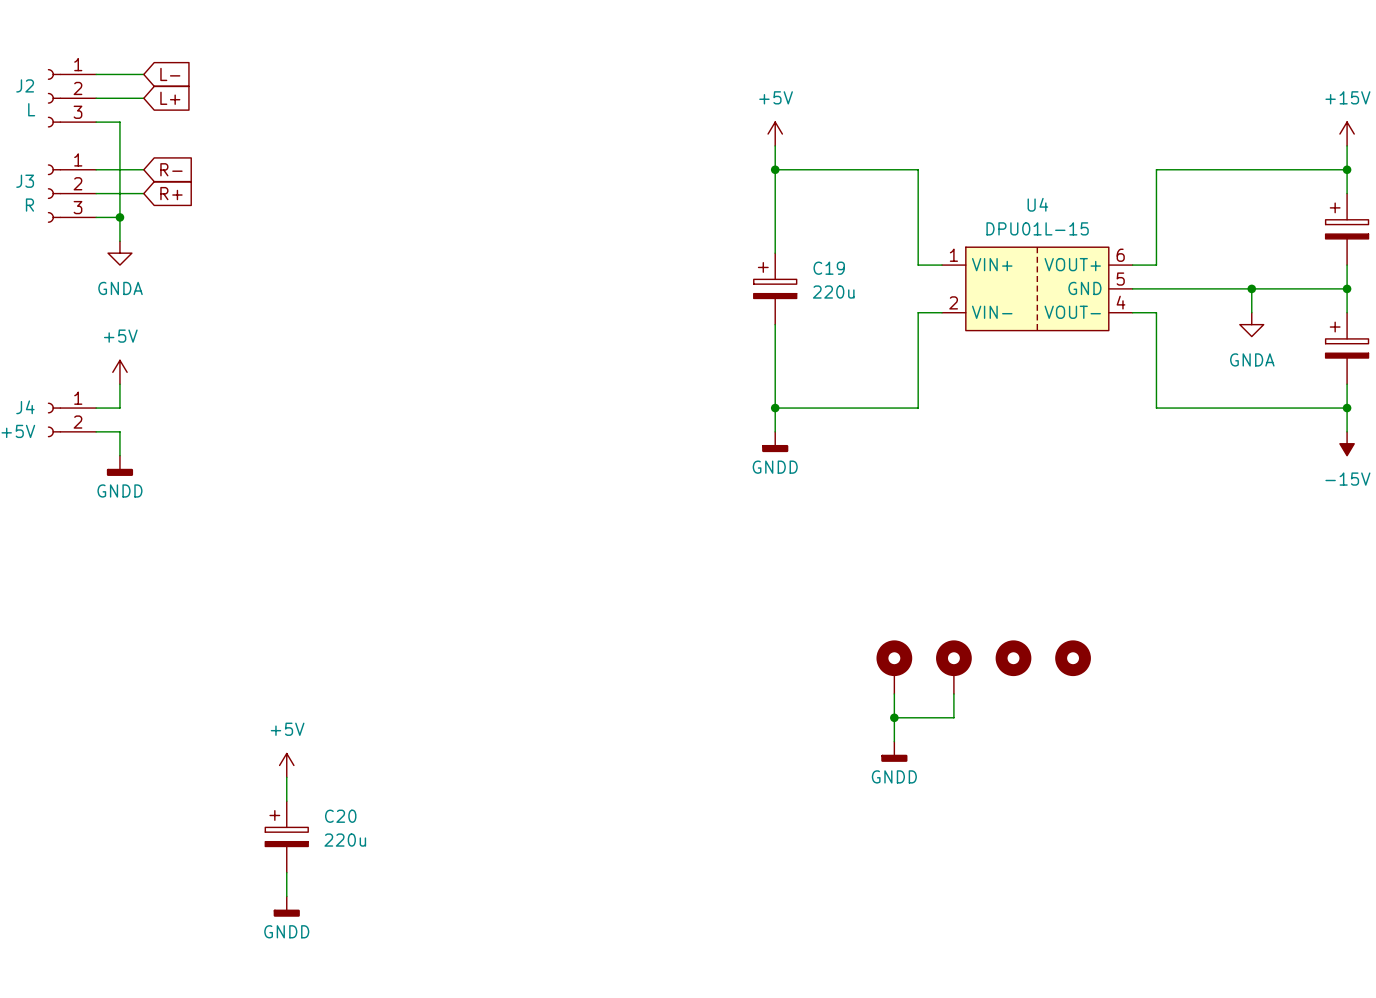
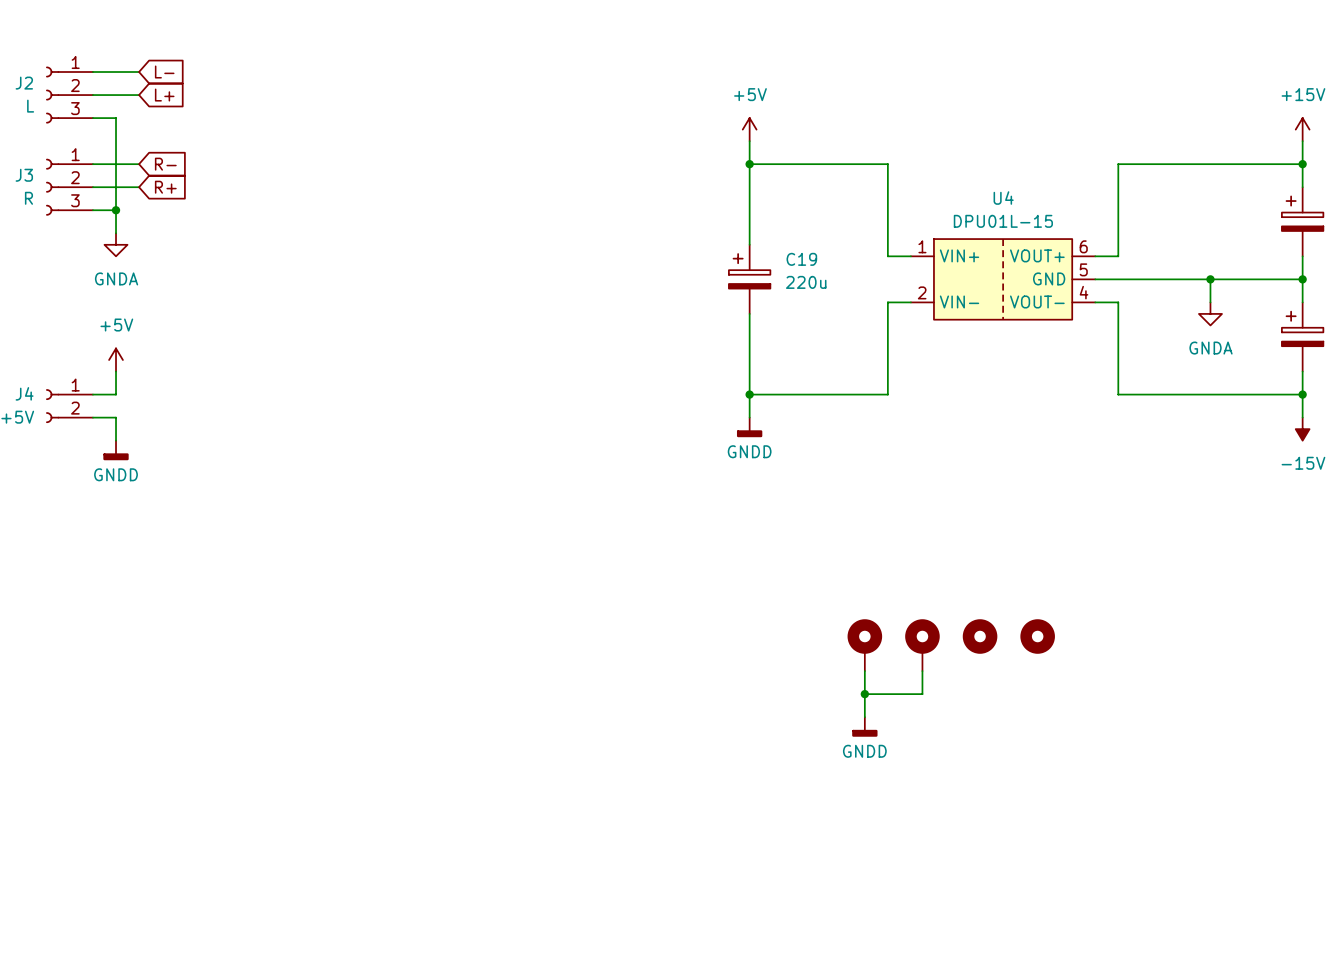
power symbol: +5V (286, 765) -> none
wire: (286, 777) (286, 801) -> none
C20: 220u (286, 836) -> none
wire: (286, 872) (286, 896) -> none
power symbol: GNDD (286, 906) -> none

